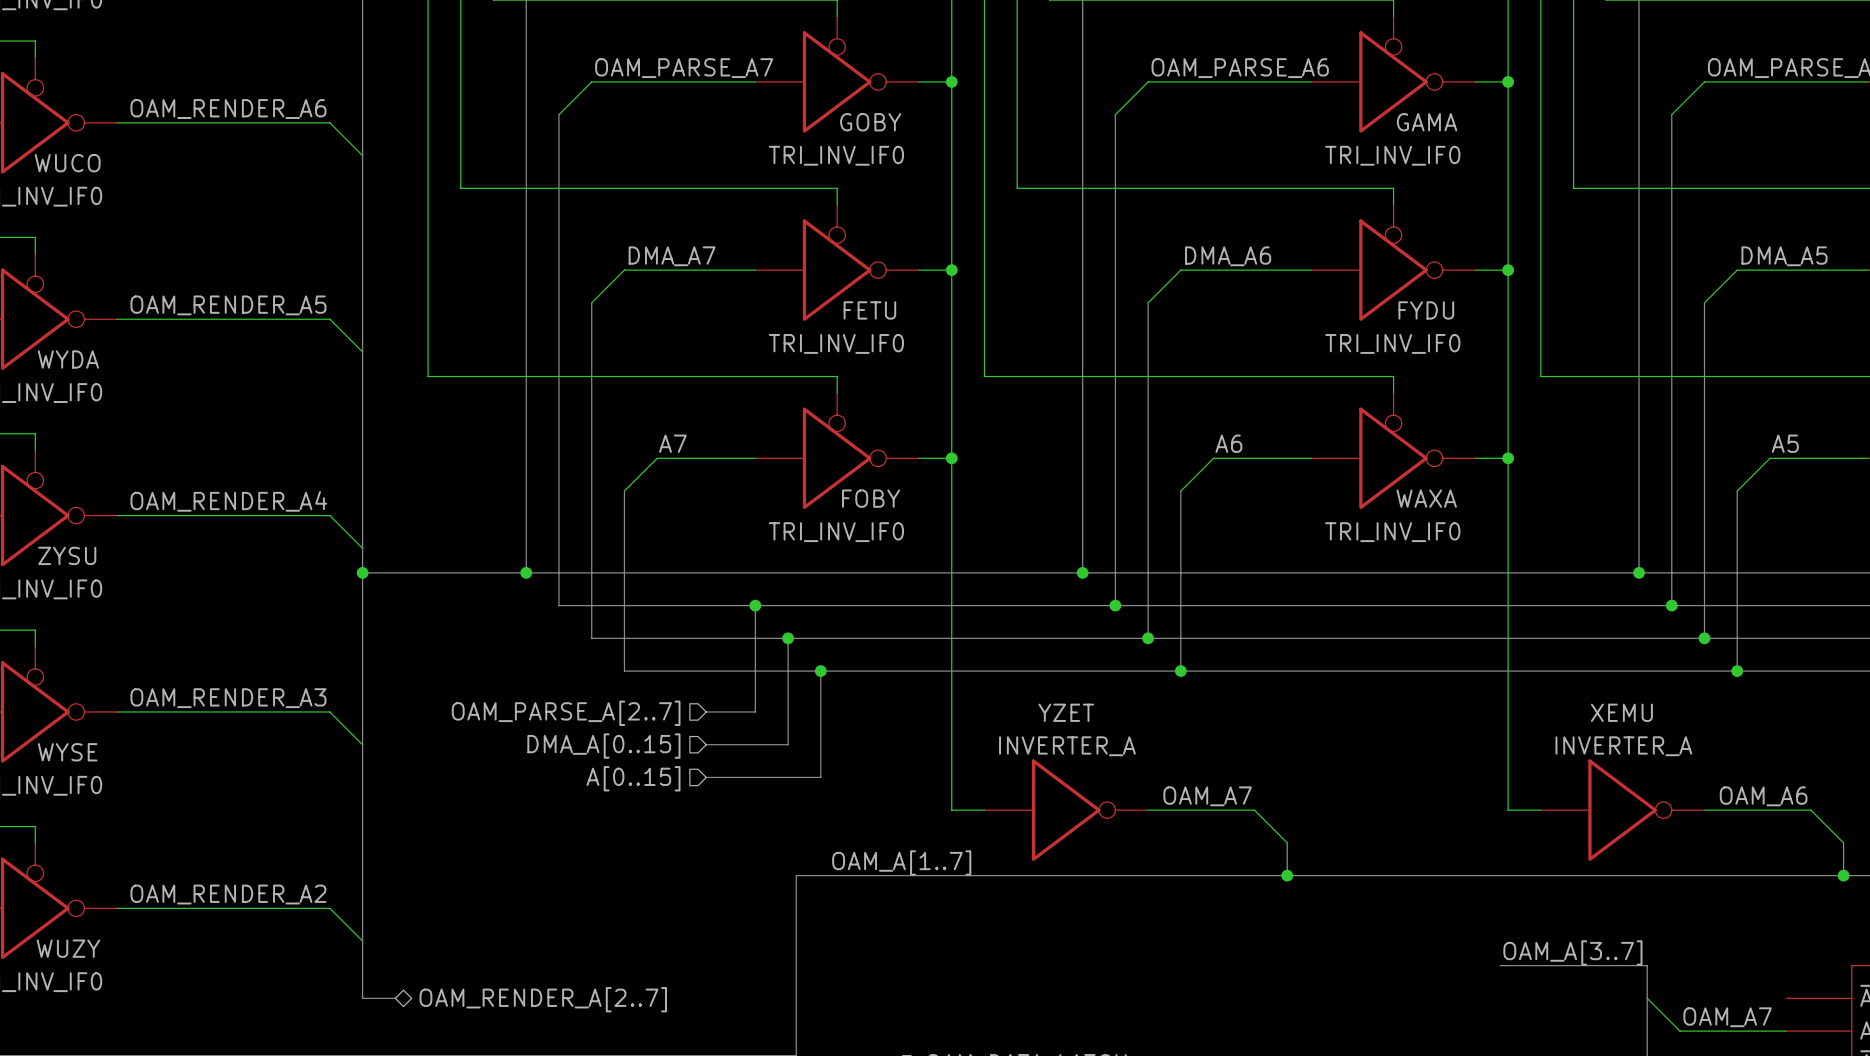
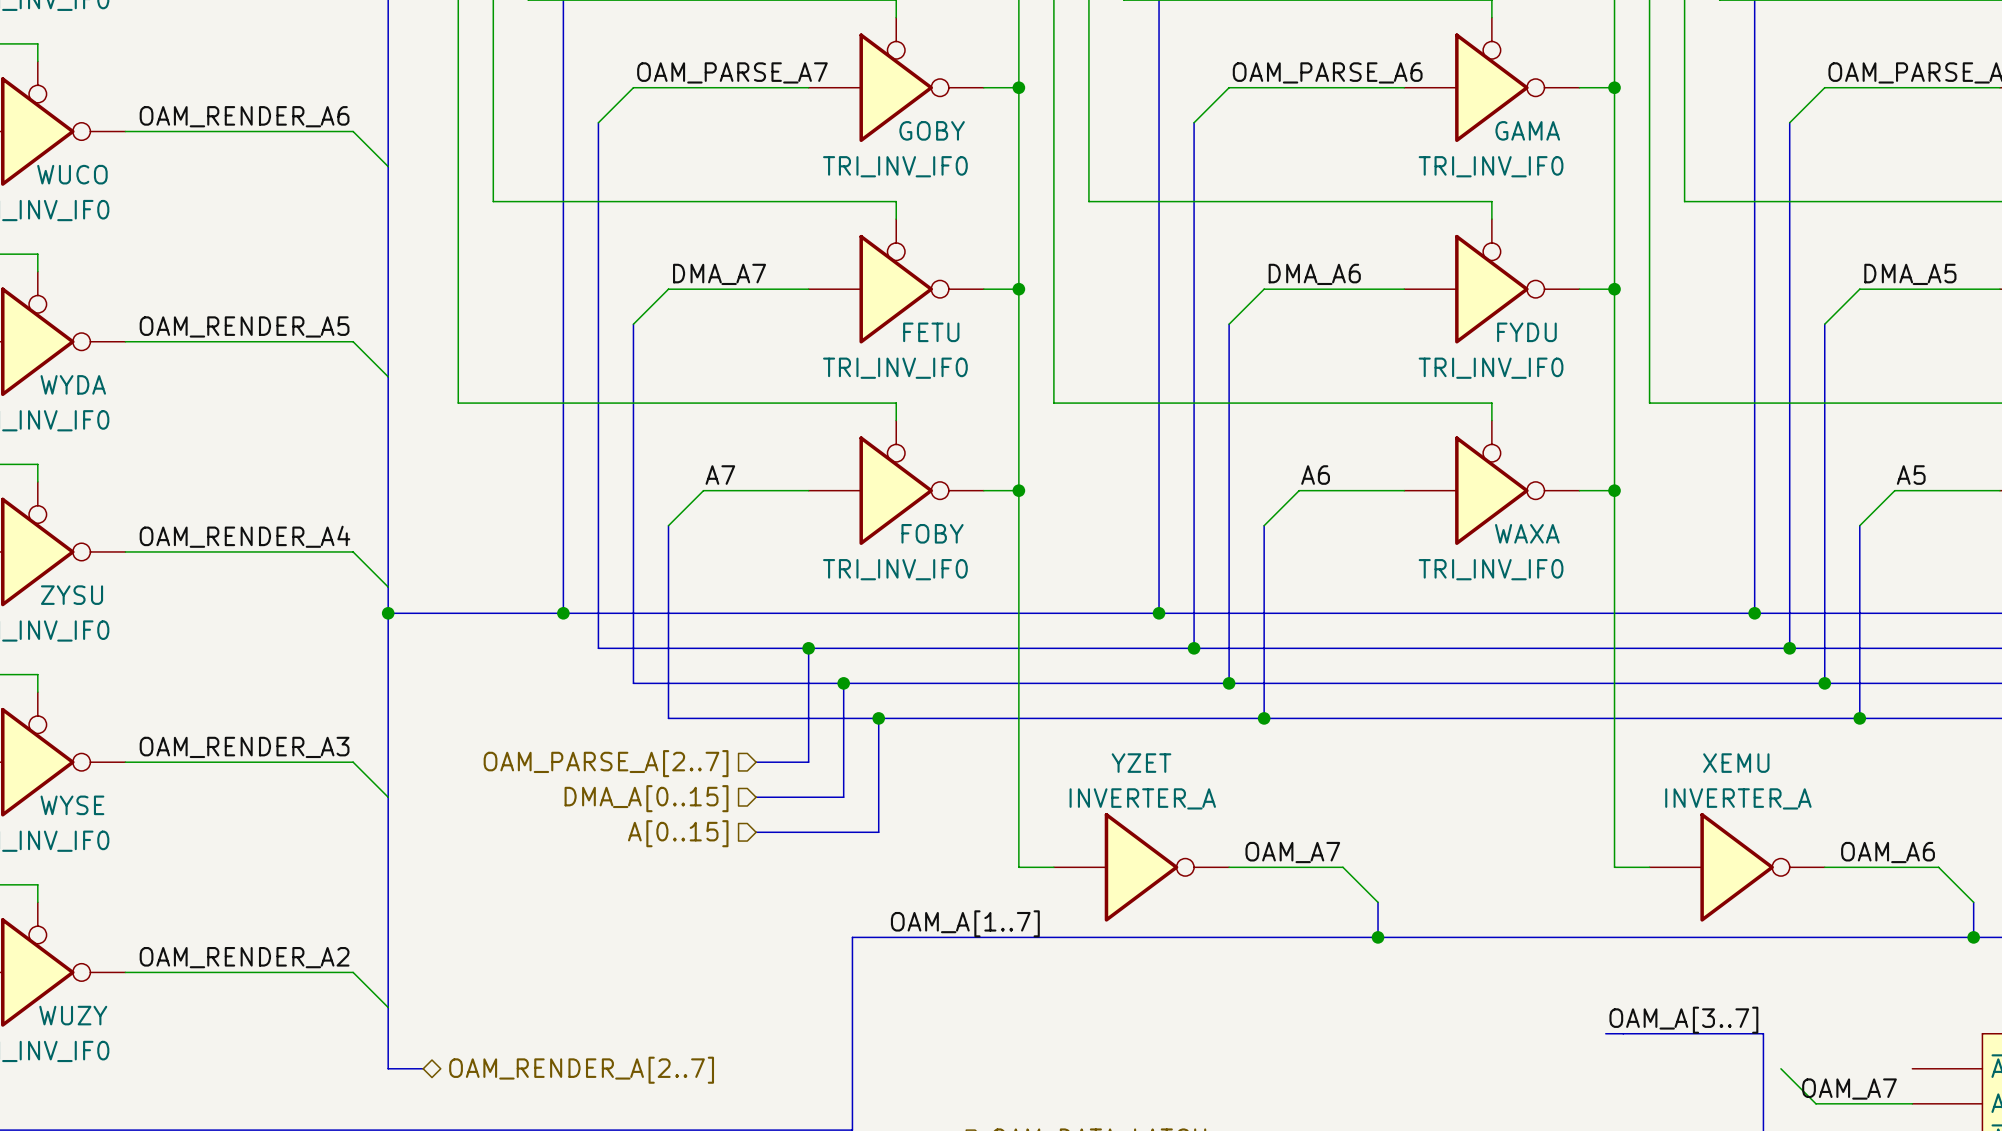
wire: (1647, 998) (1679, 1031) (1696, 1031) -> (1780, 1068) (1815, 1103)

